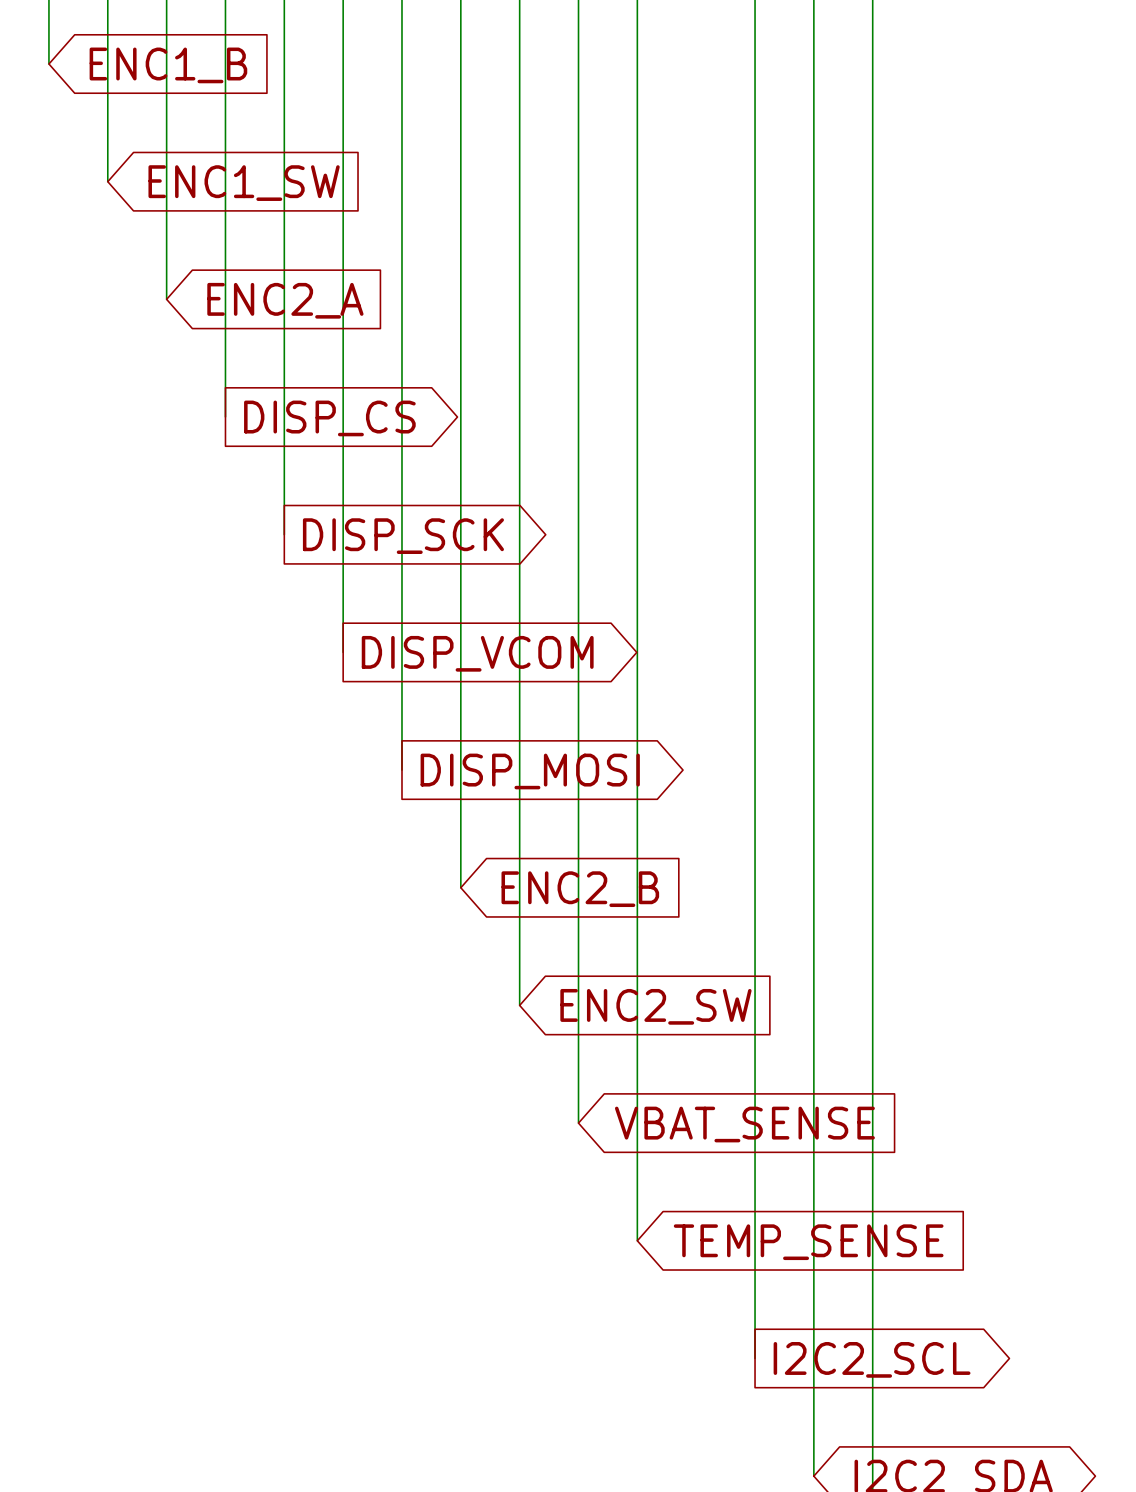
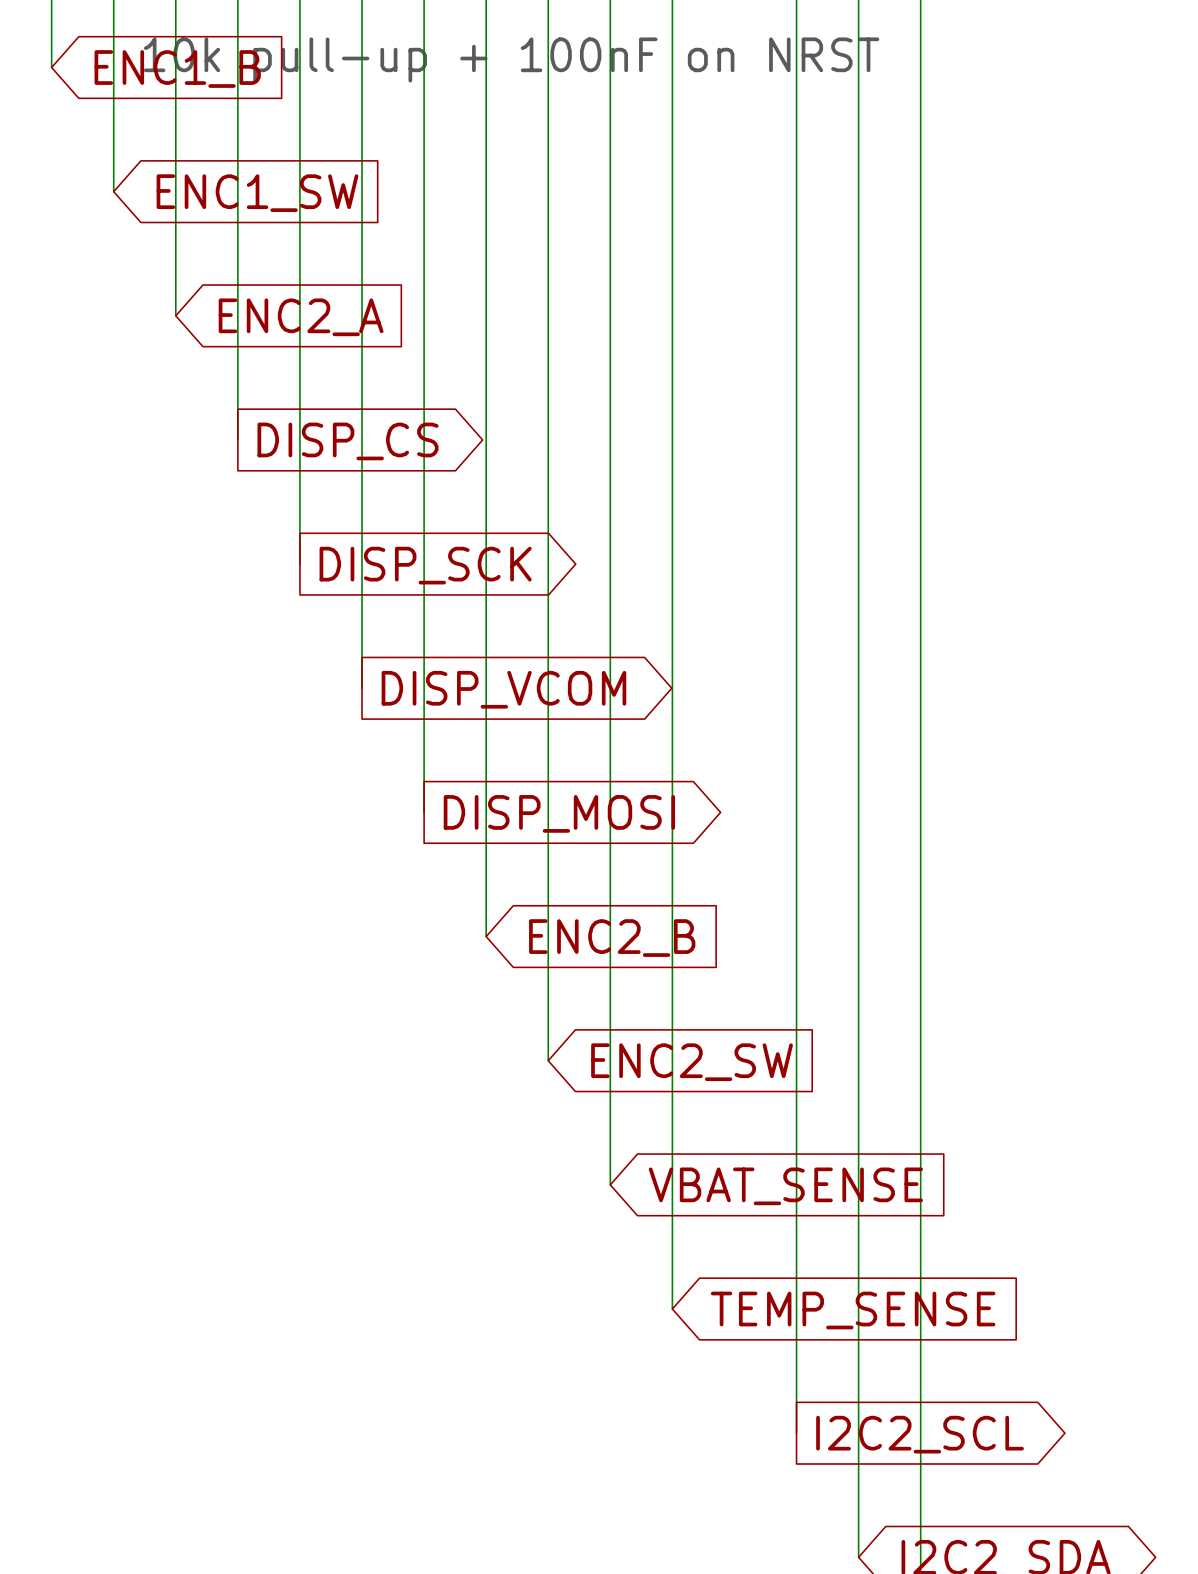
text: none -> 10k pull-up + 100nF on NRST (511, 59)

